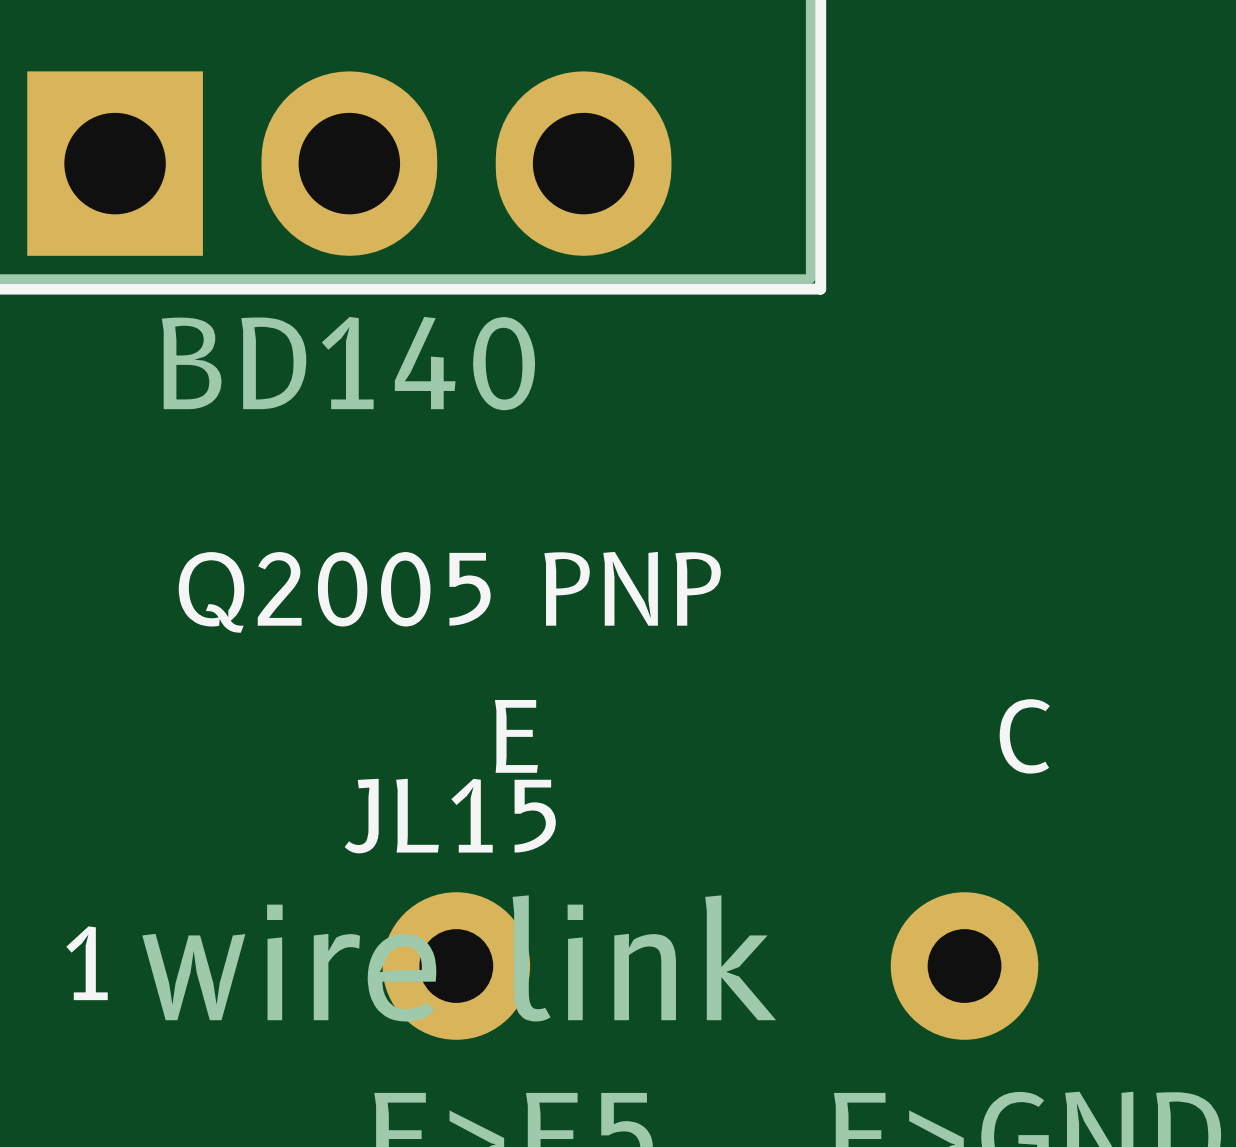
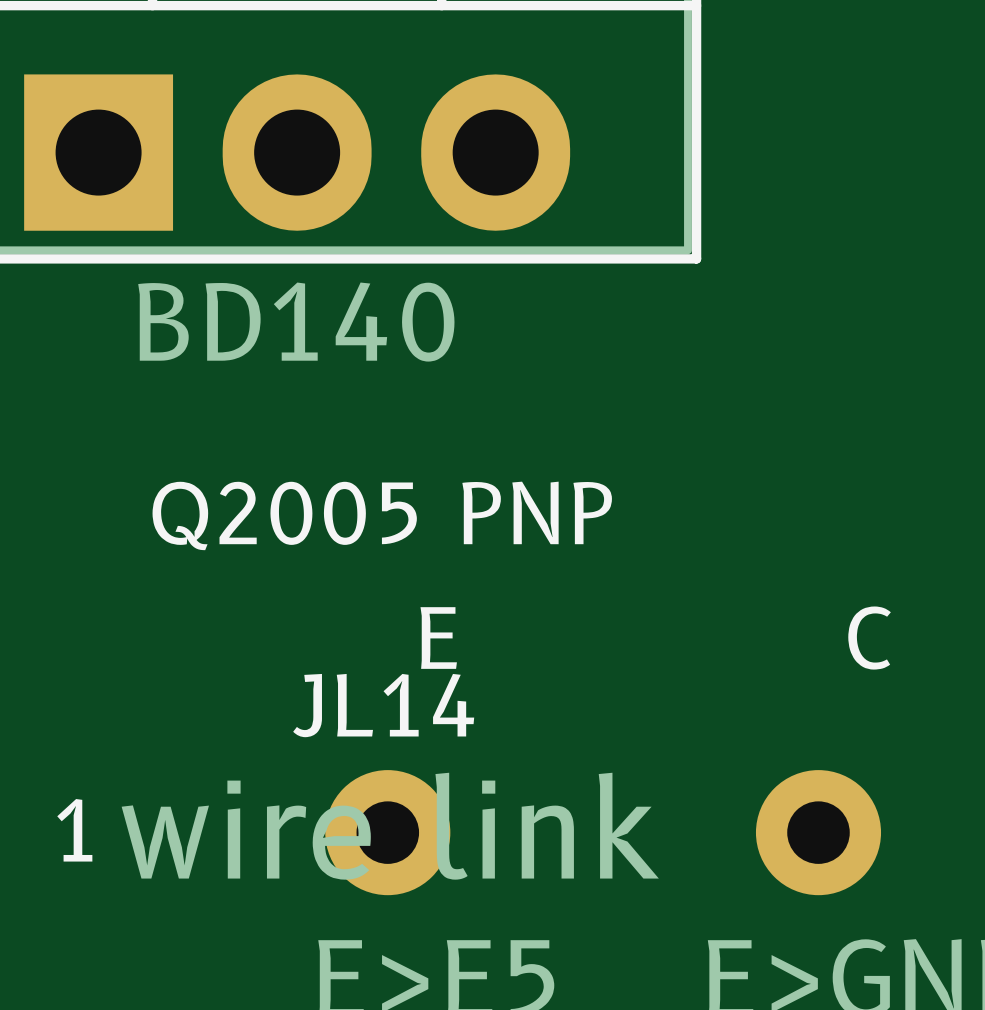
JL15 name: JL15 (450, 816) -> JL14 (383, 705)

